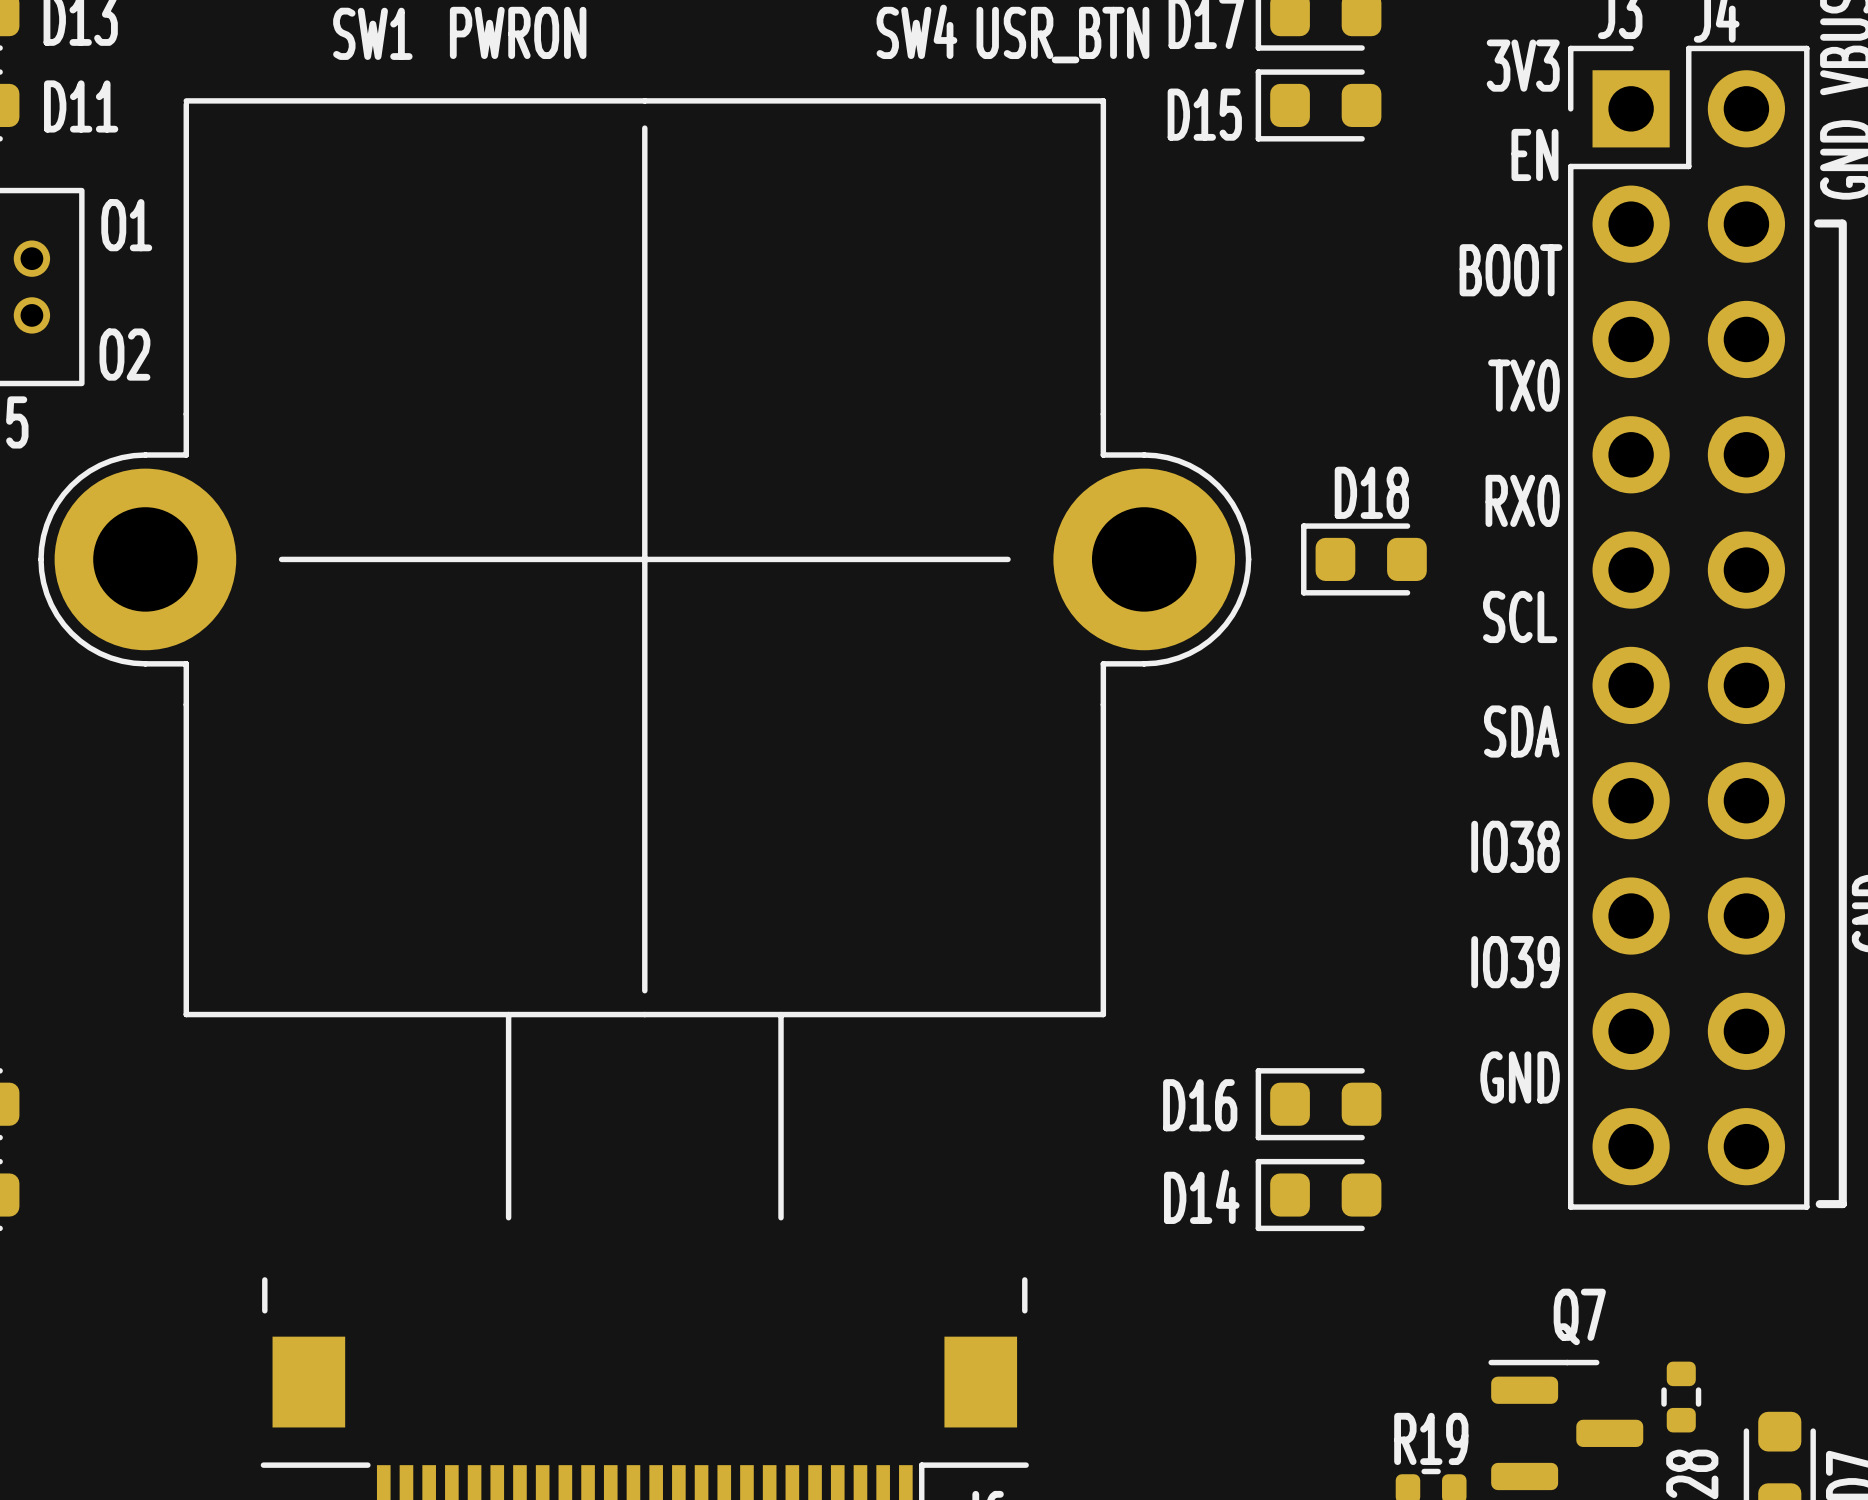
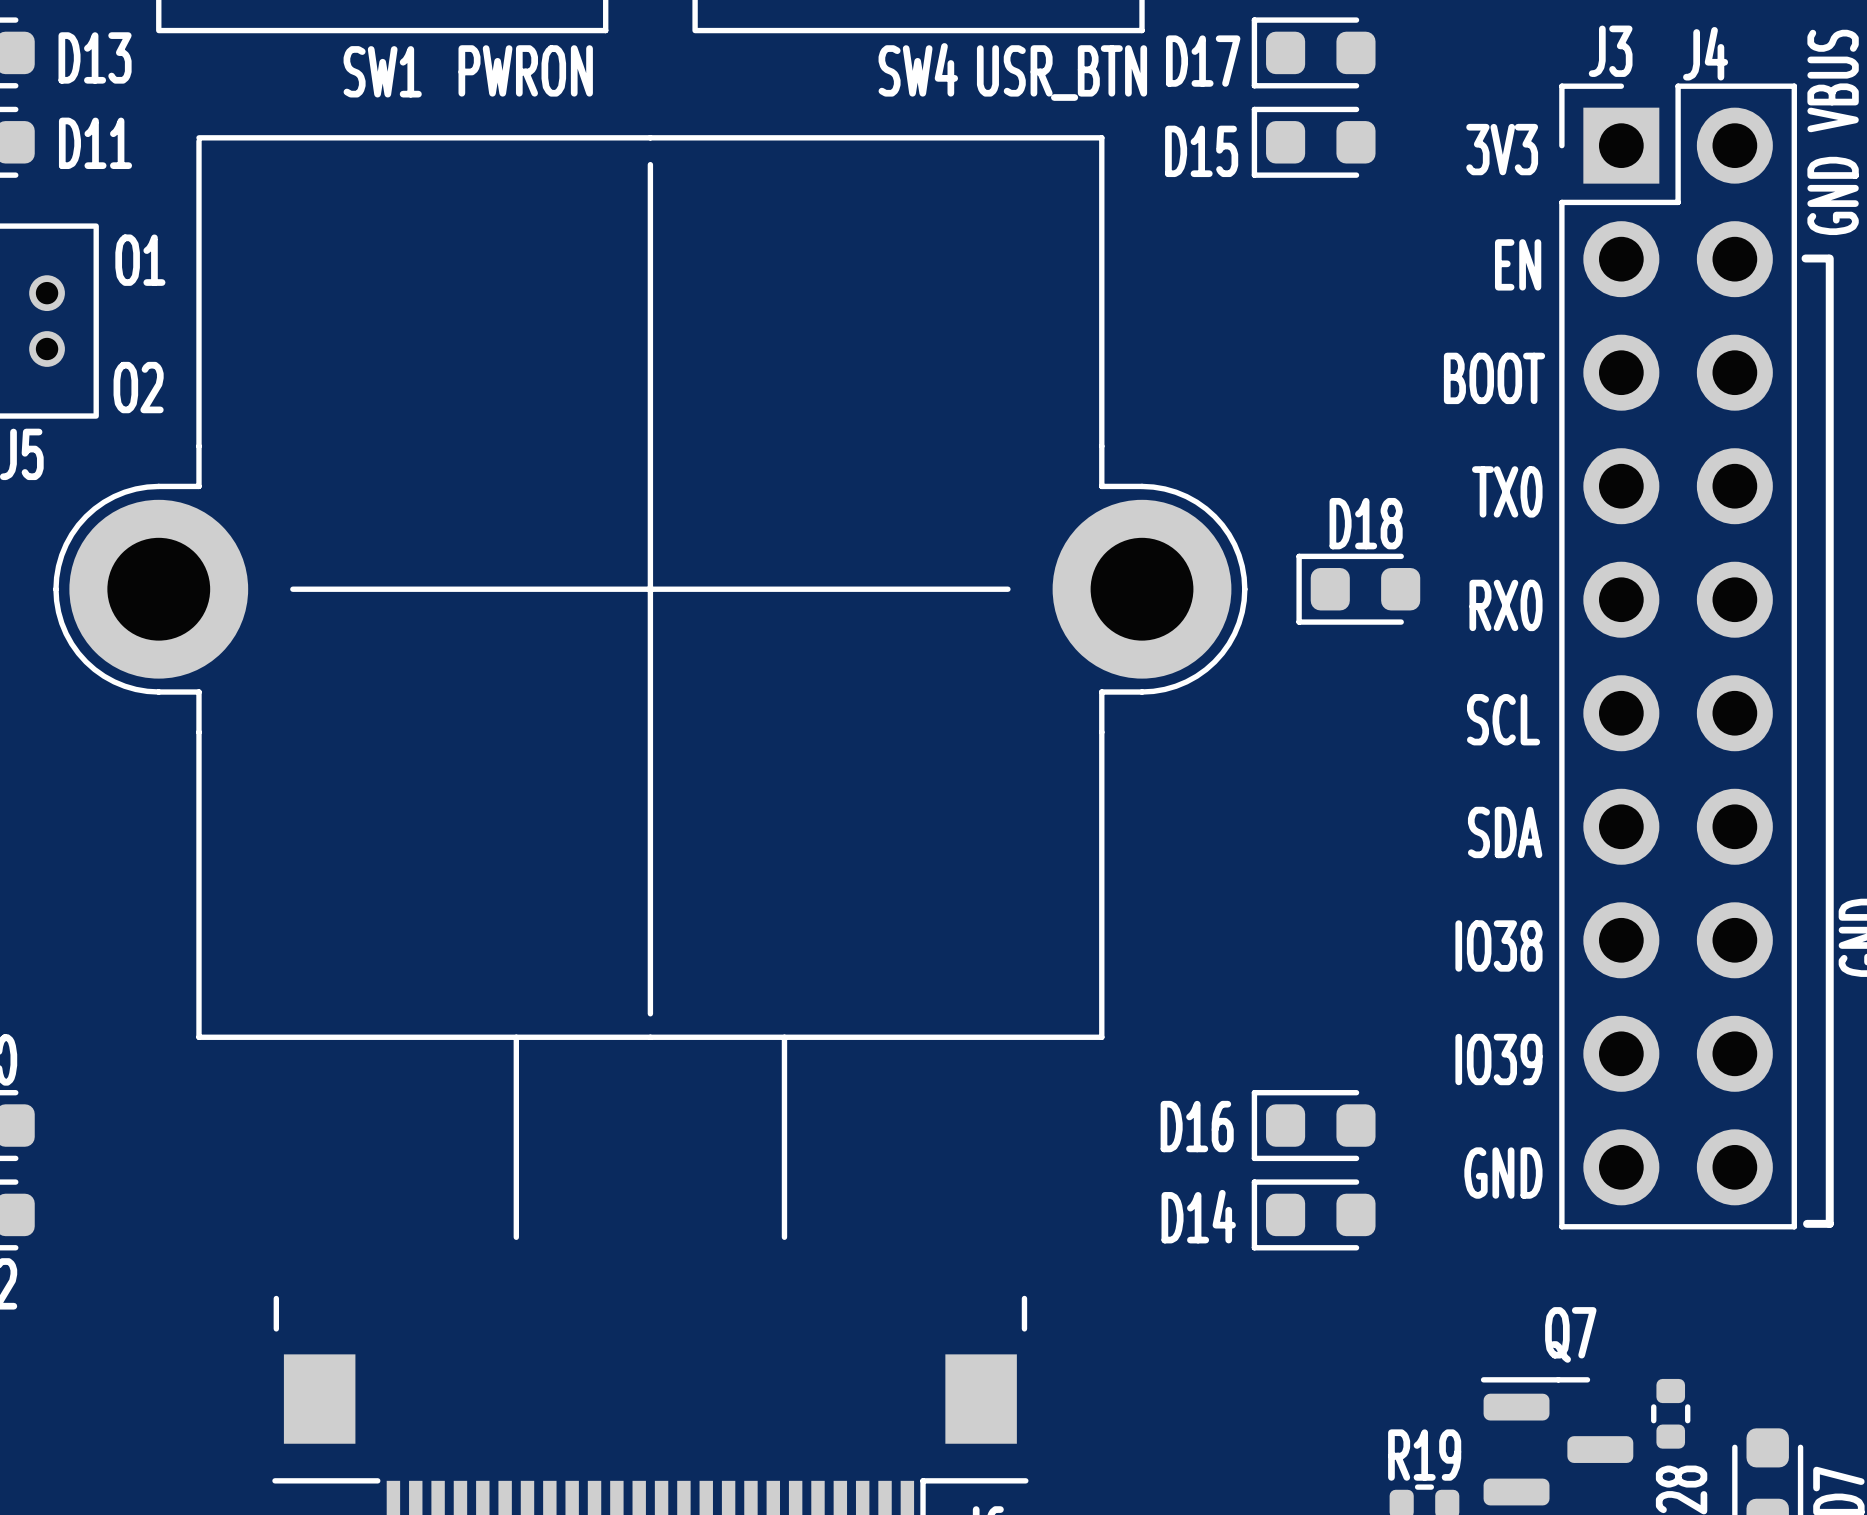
text position: 3V3 (1523, 65) -> 3V3 (1502, 149)
text position: EN (1534, 154) -> EN (1518, 264)
text position: BOOT (1510, 270) -> BOOT (1494, 378)
text position: TX0 (1523, 385) -> TX0 (1507, 491)
text position: RX0 (1522, 500) -> RX0 (1505, 605)
text position: SCL (1520, 616) -> SCL (1503, 719)
text position: SDA (1521, 731) -> SDA (1505, 832)
text position: IO38 (1515, 846) -> IO38 (1498, 945)
text position: IO39 (1515, 962) -> IO39 (1498, 1059)
text position: GND (1520, 1077) -> GND (1503, 1173)

